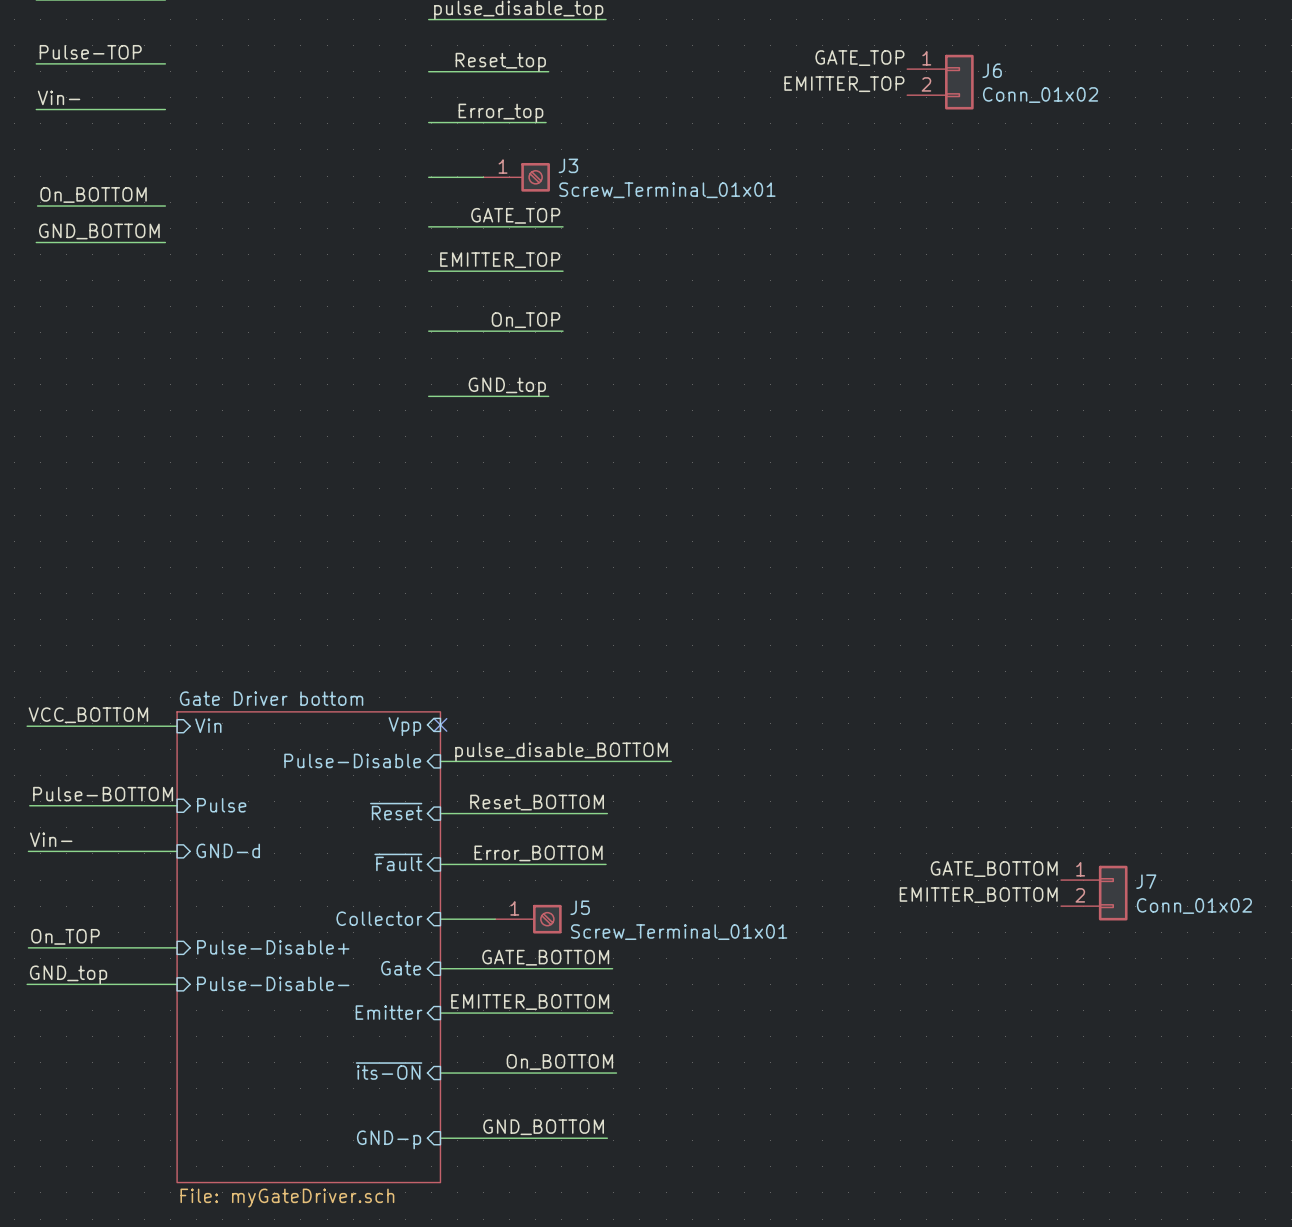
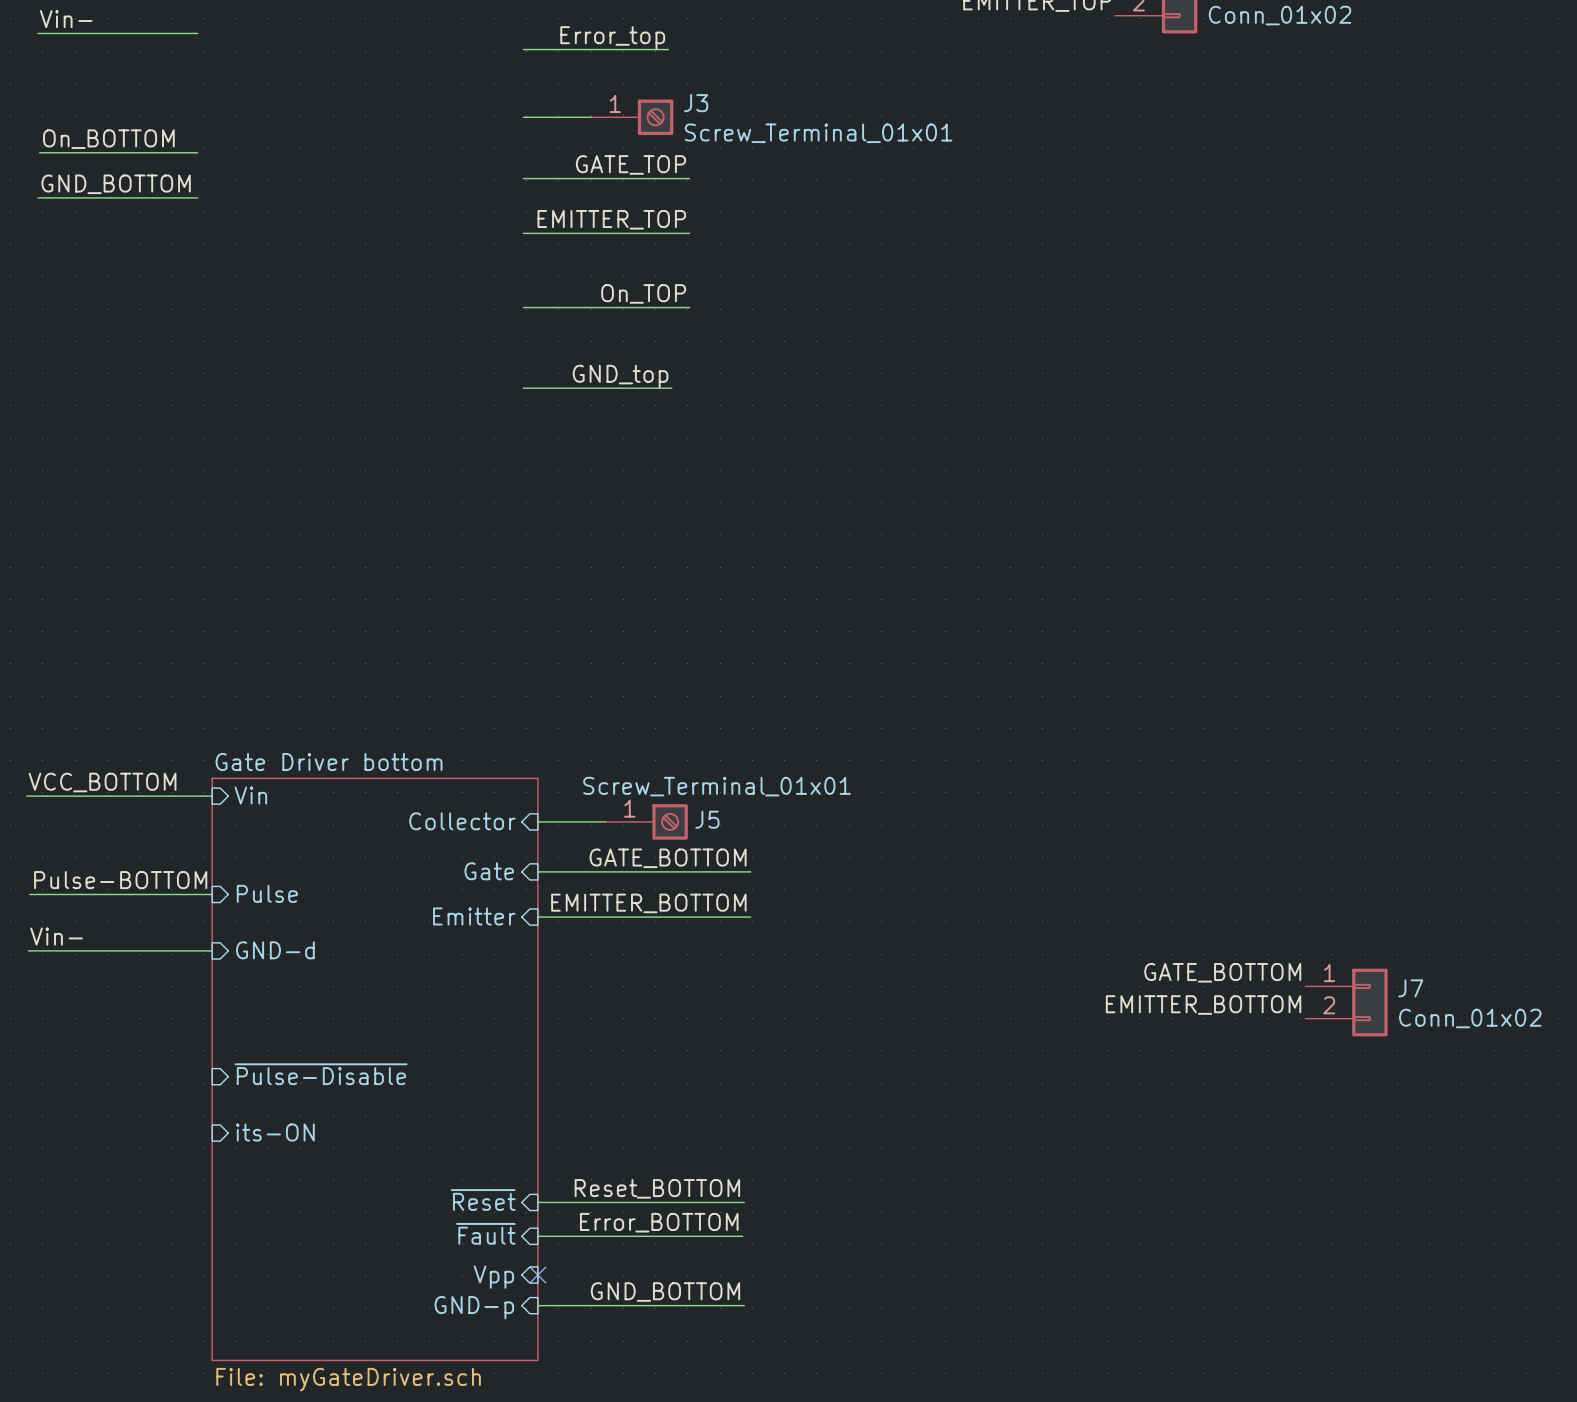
no-connect mark: (440, 724) -> none
sheet pin: Vpp (404, 726) -> none
label: pulse_disable_BOTTOM (561, 751) -> none
sheet pin: Pulse-Disable (352, 760) -> none
wire: (440, 761) (671, 761) -> none
label position: Reset_BOTTOM (537, 802) -> Reset_BOTTOM (657, 1188)
sheet pin position: ~{Reset} (396, 811) -> ~{Reset} (483, 1199)
wire: (440, 813) (607, 813) -> (537, 1202) (744, 1202)
label position: Error_BOTTOM (538, 853) -> Error_BOTTOM (659, 1222)
sheet pin position: ~{Fault} (398, 862) -> ~{Fault} (485, 1233)
wire: (440, 864) (606, 864) -> (537, 1236) (742, 1236)
J5 name position: J5 (580, 907) -> J5 (707, 819)
sheet pin position: Collector (379, 918) -> Collector (462, 821)
wire: (440, 919) (495, 919) -> (537, 821) (605, 821)
J5 position: (528, 919) -> (646, 821)
J5 value position: Screw_Terminal_01x01 (679, 932) -> Screw_Terminal_01x01 (716, 786)
label: On_TOP (65, 936) -> none
wire: (28, 947) (177, 947) -> none
sheet pin: Pulse-Disable+ (273, 947) -> ~{Pulse-Disable} (321, 1074)
label position: GATE_BOTTOM (545, 957) -> GATE_BOTTOM (668, 858)
sheet pin position: Gate (401, 968) -> Gate (489, 871)
wire: (440, 968) (612, 968) -> (537, 917) (750, 917)
label: GND_top (68, 974) -> none
sheet pin: Pulse-Disable- (273, 983) -> none
wire: (27, 984) (177, 984) -> none
sheet pin: none -> its-ON (275, 1132)
label position: EMITTER_BOTTOM (530, 1002) -> EMITTER_BOTTOM (648, 903)
sheet pin position: Emitter (389, 1012) -> Emitter (474, 916)
wire: (440, 1013) (612, 1013) -> (537, 871) (750, 871)
label: On_BOTTOM (559, 1062) -> none
sheet pin: ~{its-ON} (389, 1071) -> none
wire: (440, 1073) (616, 1073) -> none
no-connect mark: none -> (537, 1275)
sheet pin: none -> Vpp (493, 1277)

